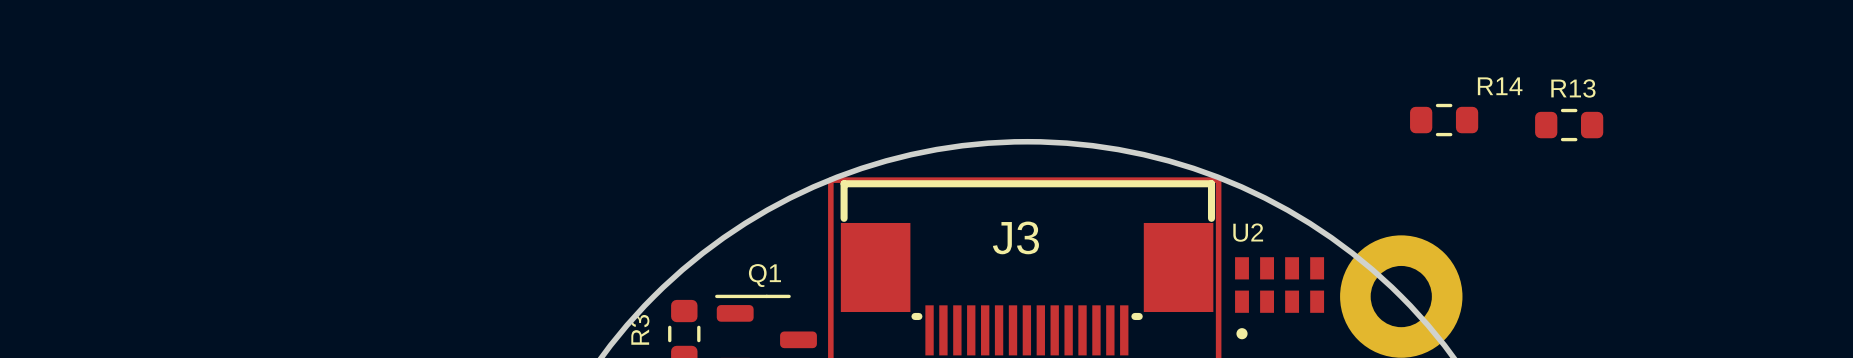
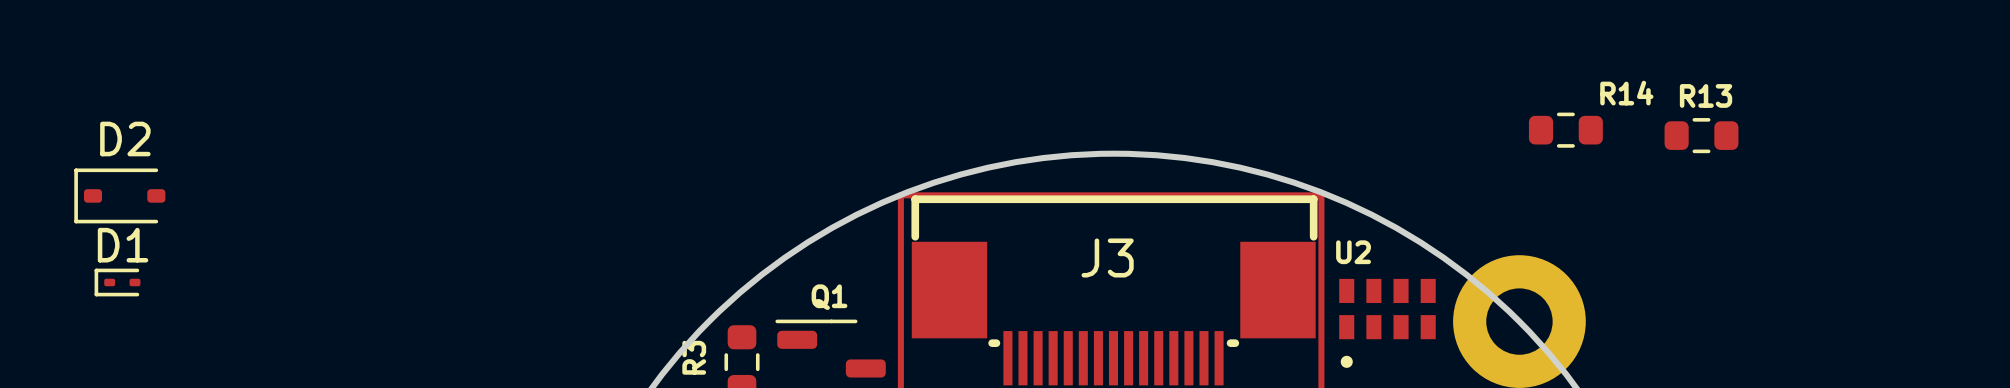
D2: none -> (119, 195)
D1: none -> (117, 282)

